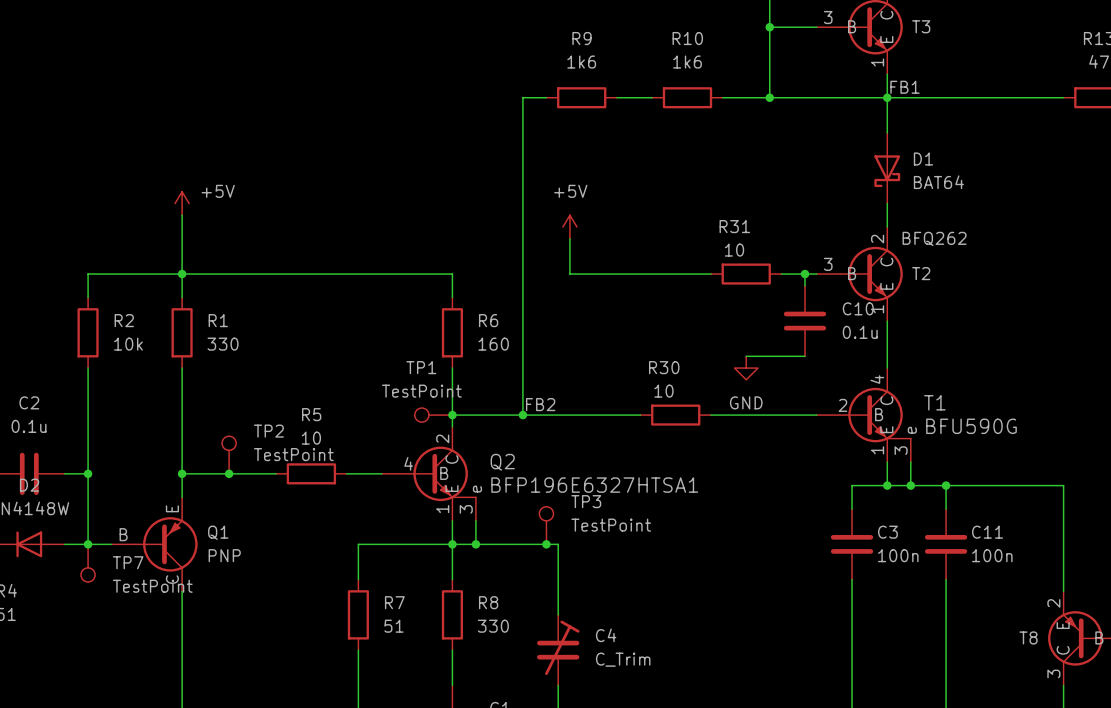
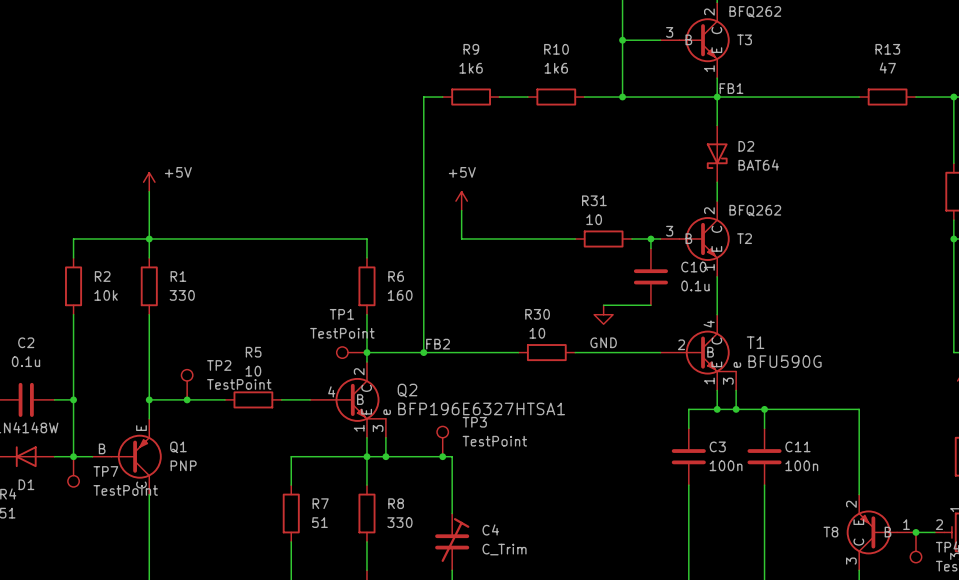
D1 name: D1 (923, 159) -> D2 (746, 146)
D2 name: D2 (29, 485) -> D1 (26, 484)

